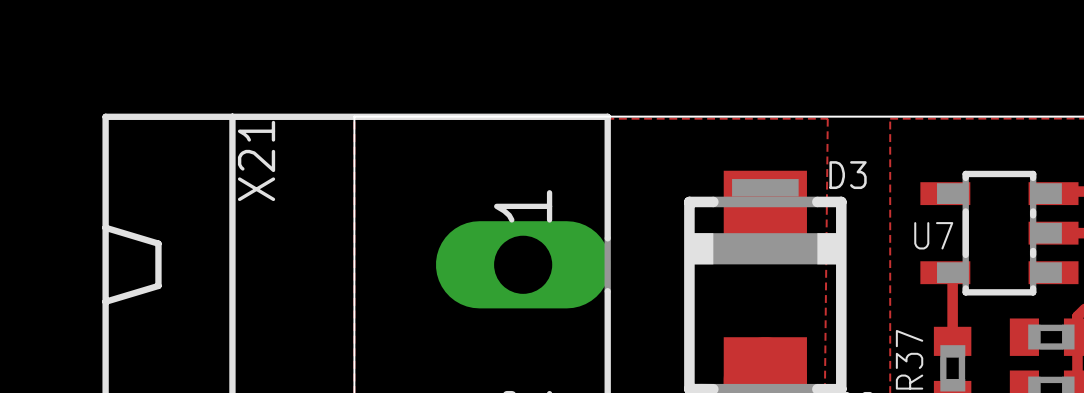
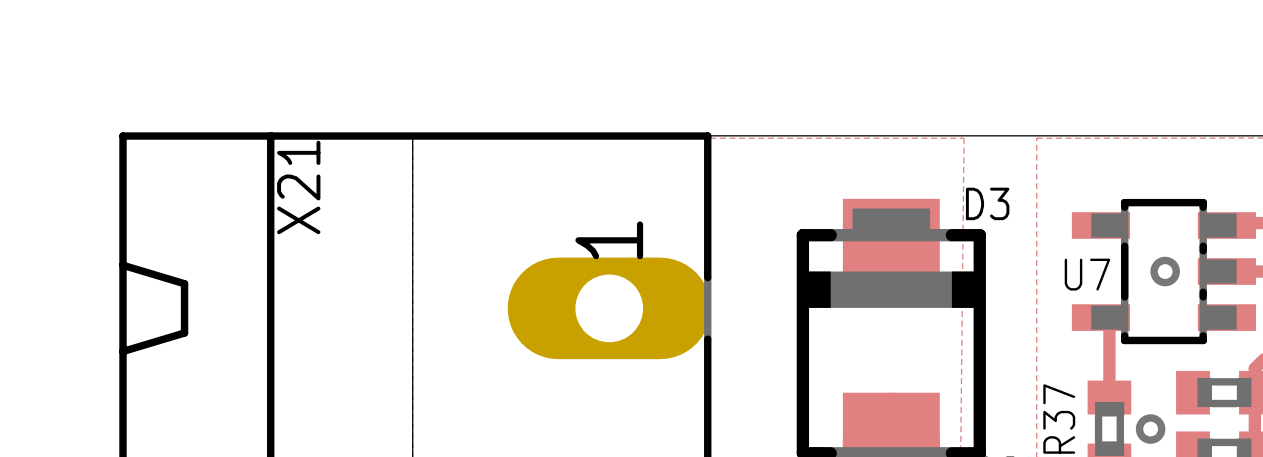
via: none -> (1165, 271)
via: none -> (1150, 429)

